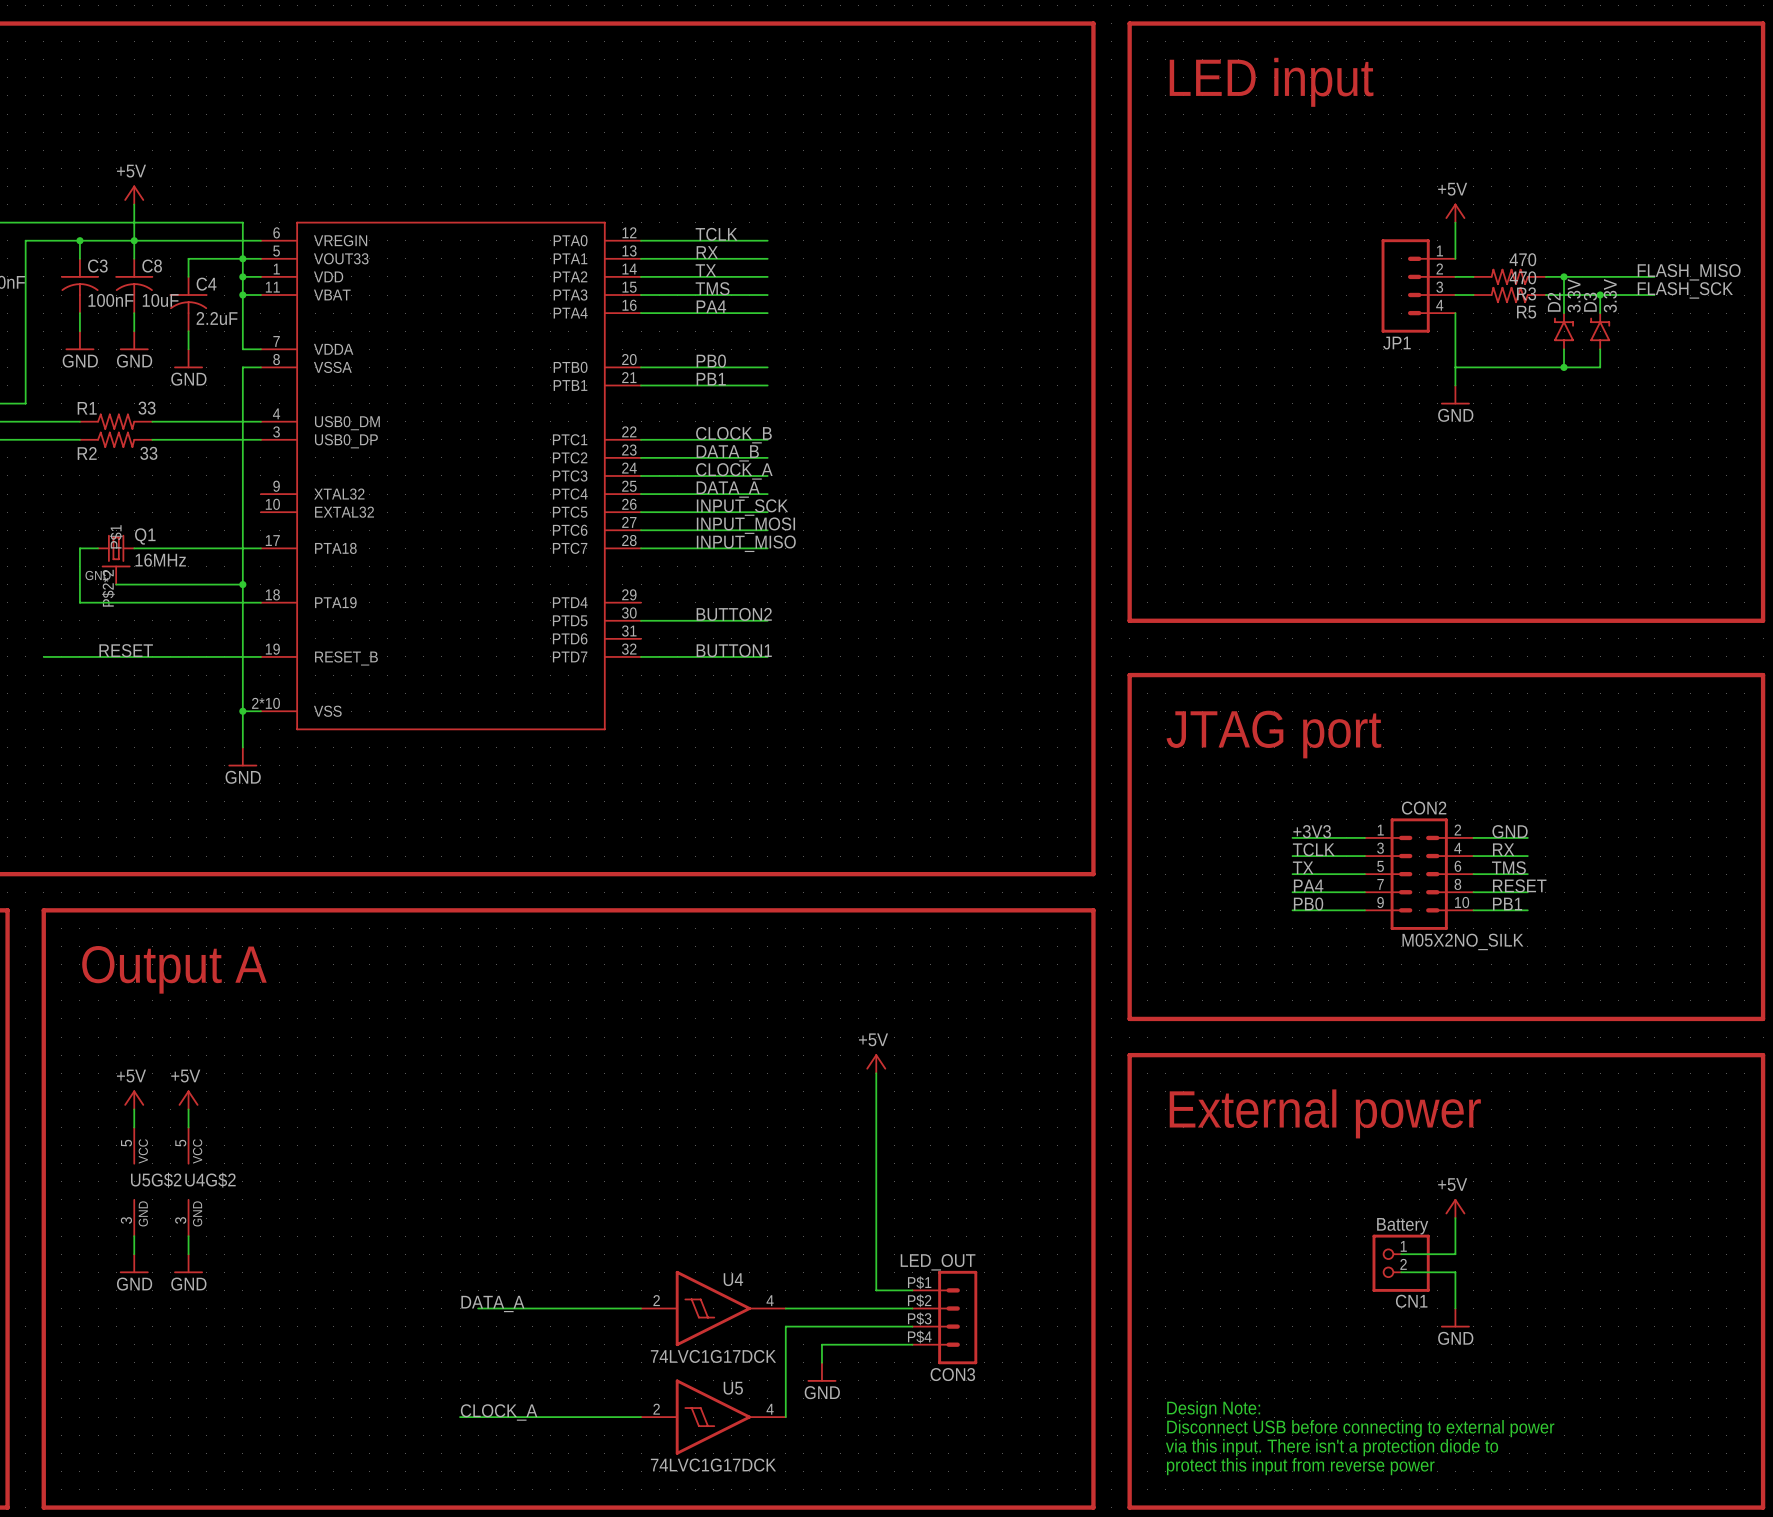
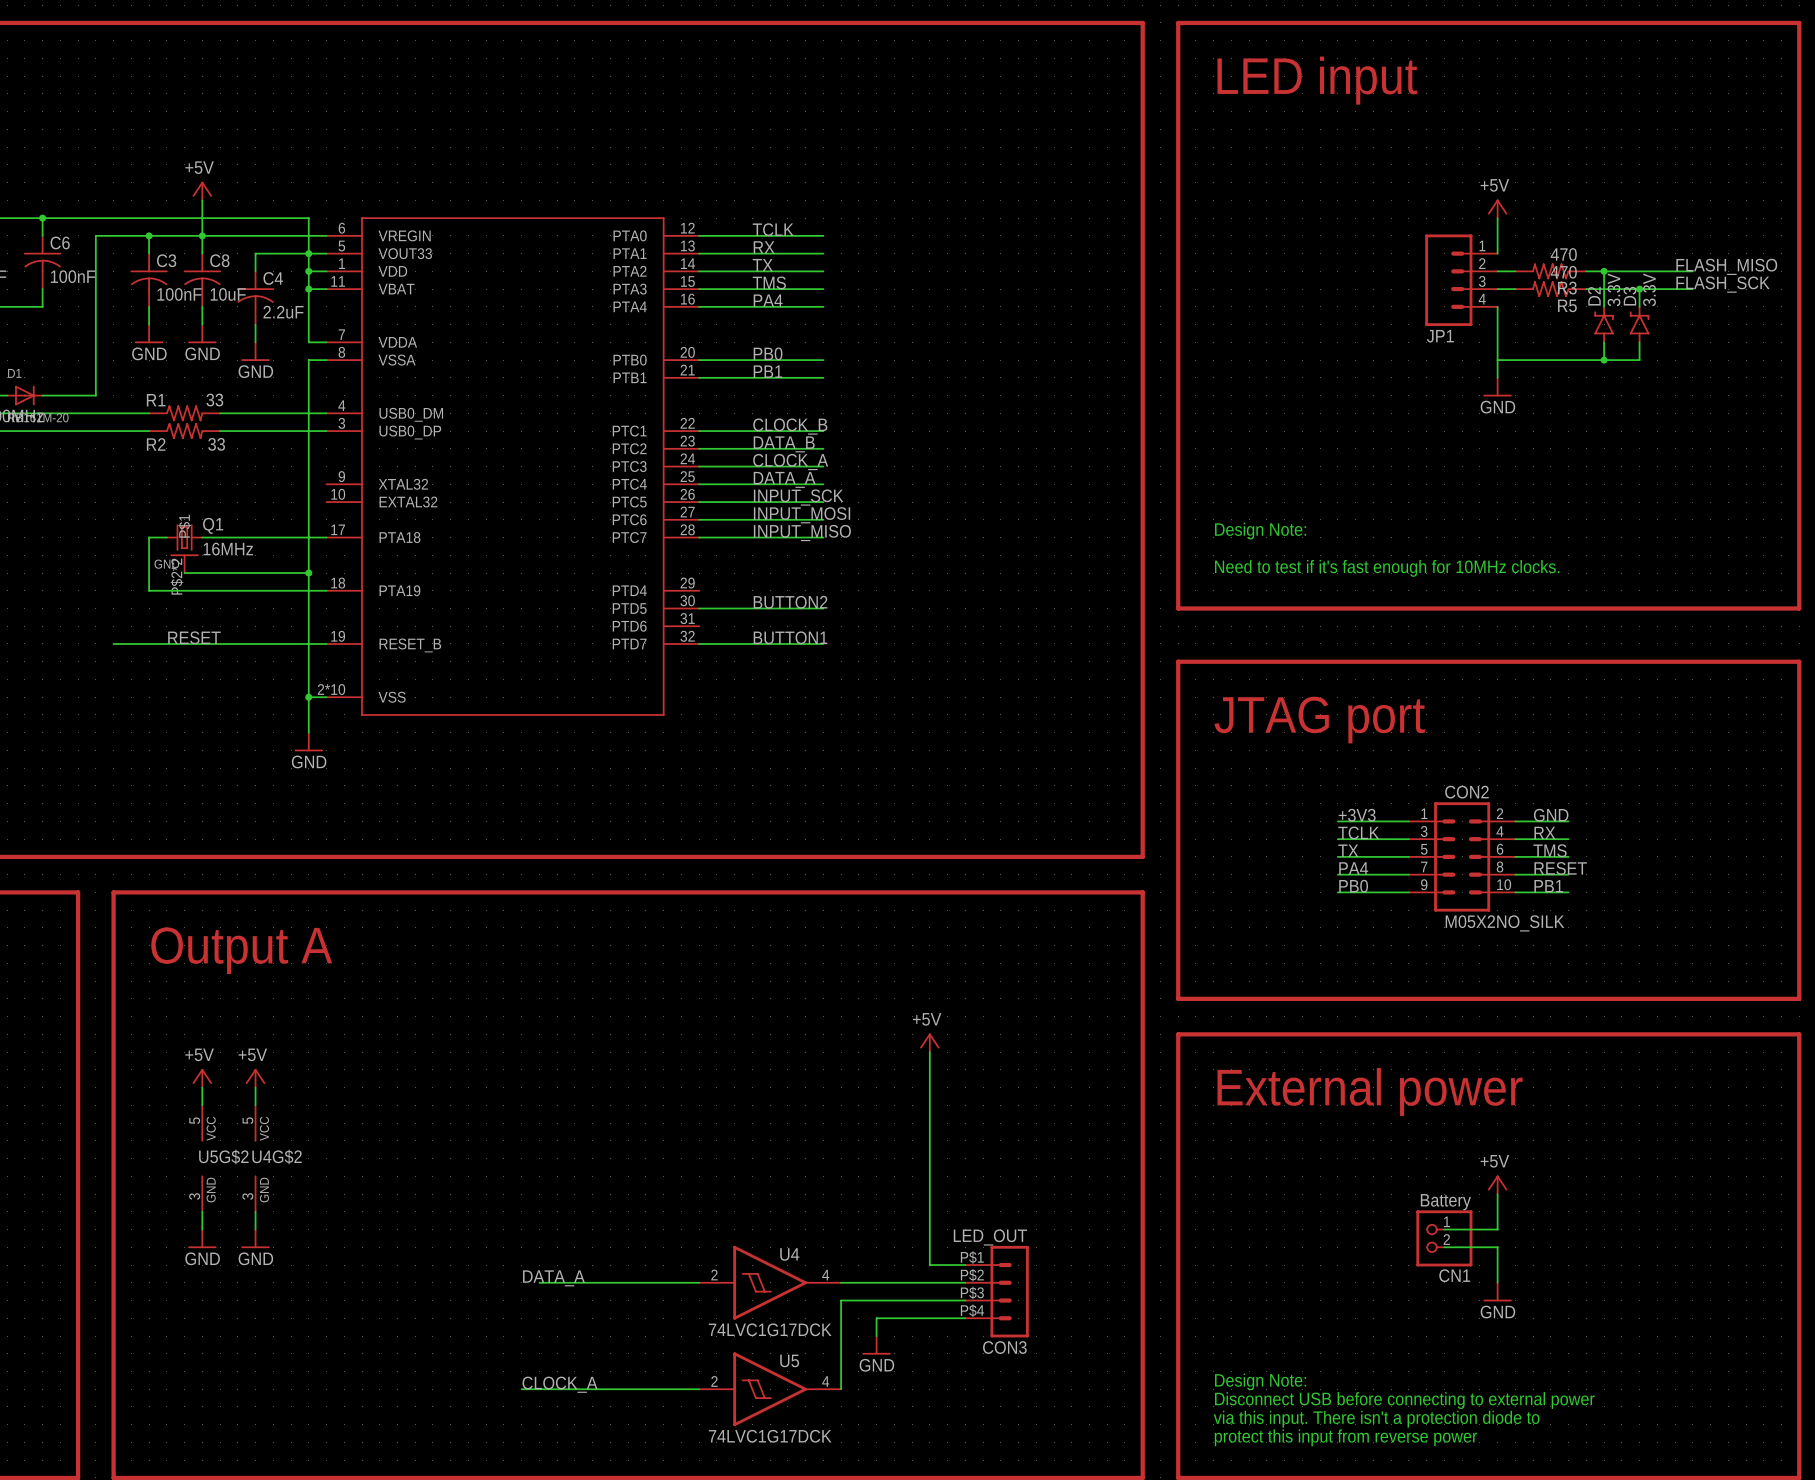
text: none -> Design Note: (1260, 531)
text: none -> Need to test if it's fast enough for 10MHz clocks. (1387, 568)

